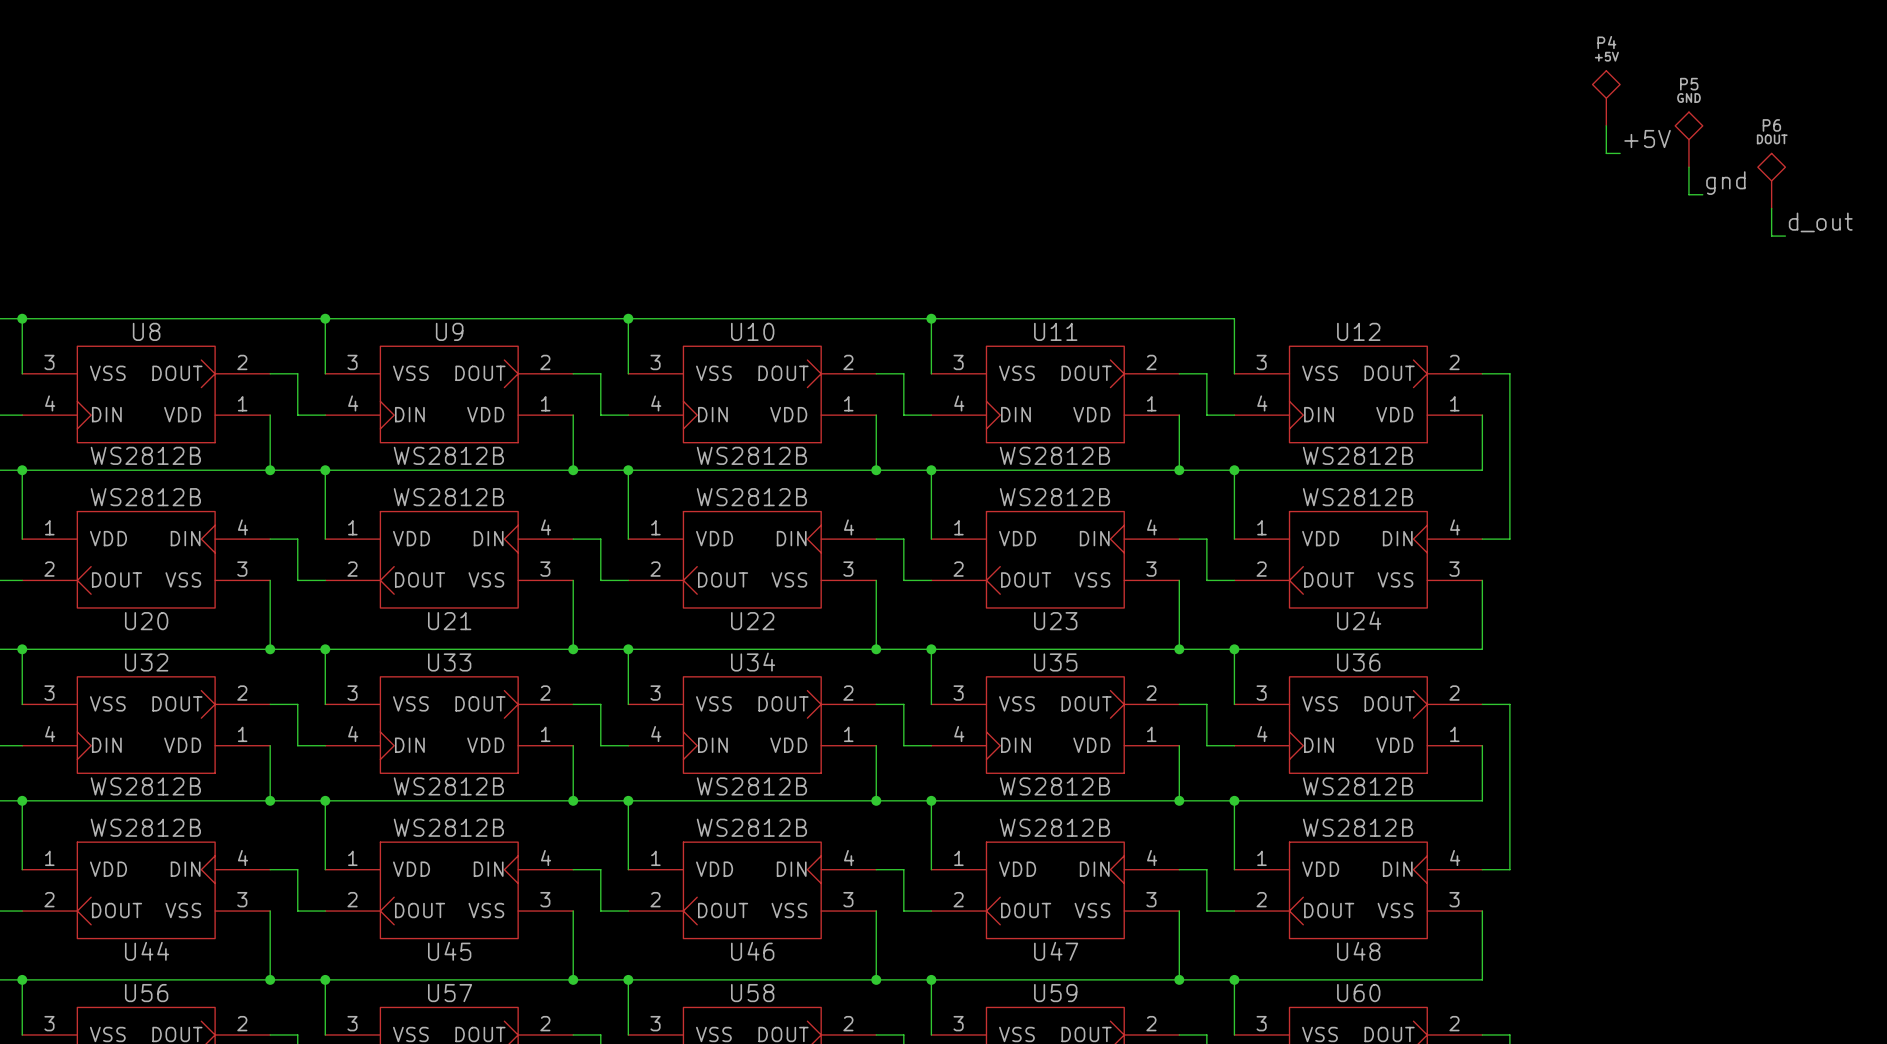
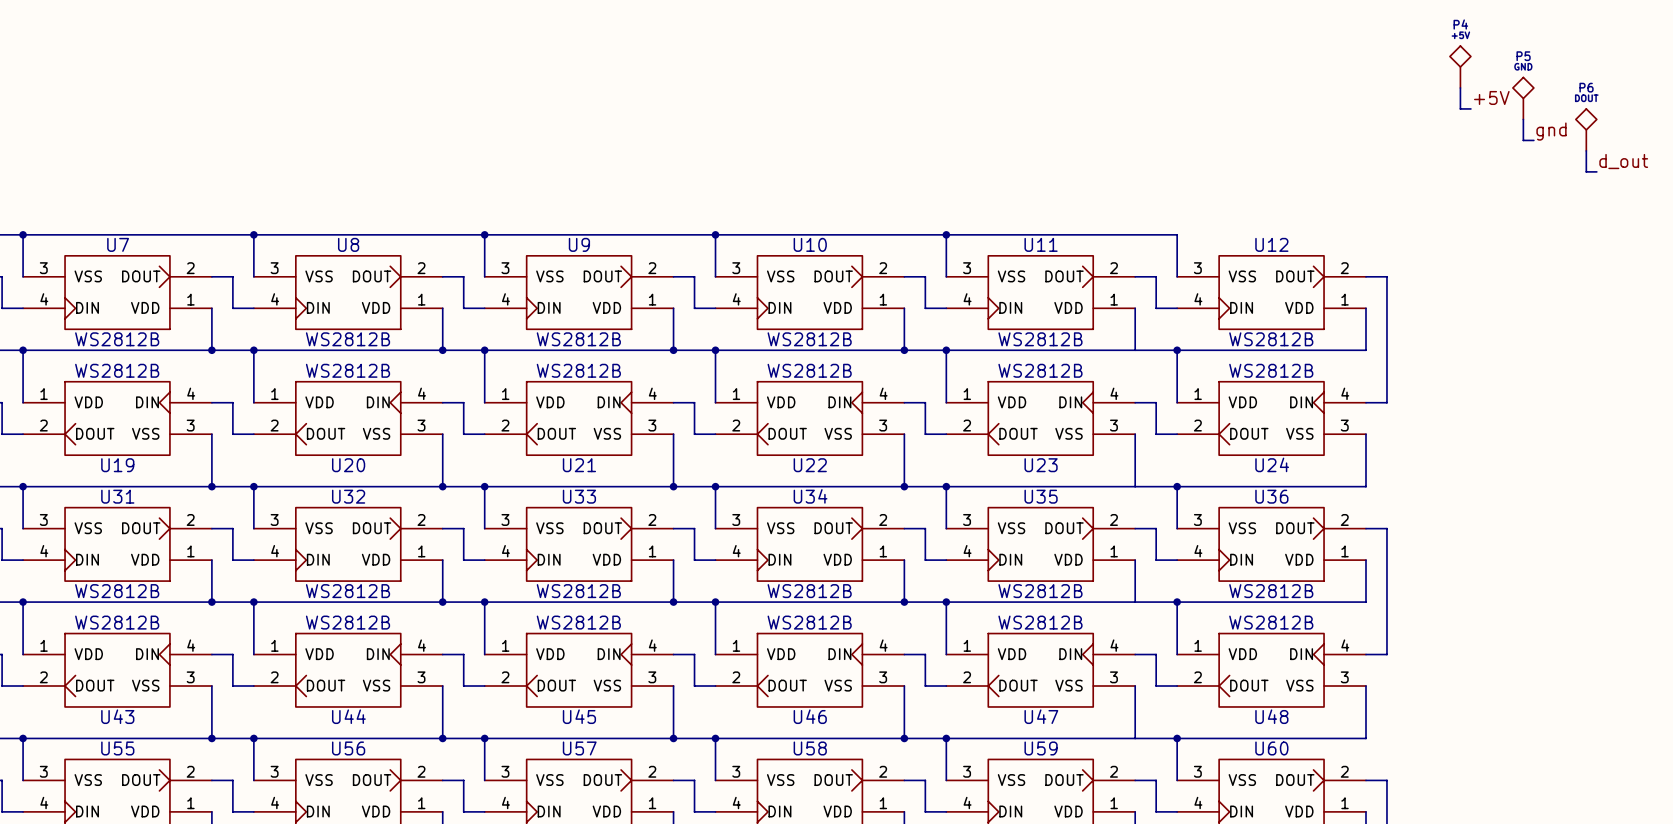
junction: (1179, 470) -> none
junction: (1179, 649) -> none
junction: (1179, 800) -> none
junction: (1179, 979) -> none

